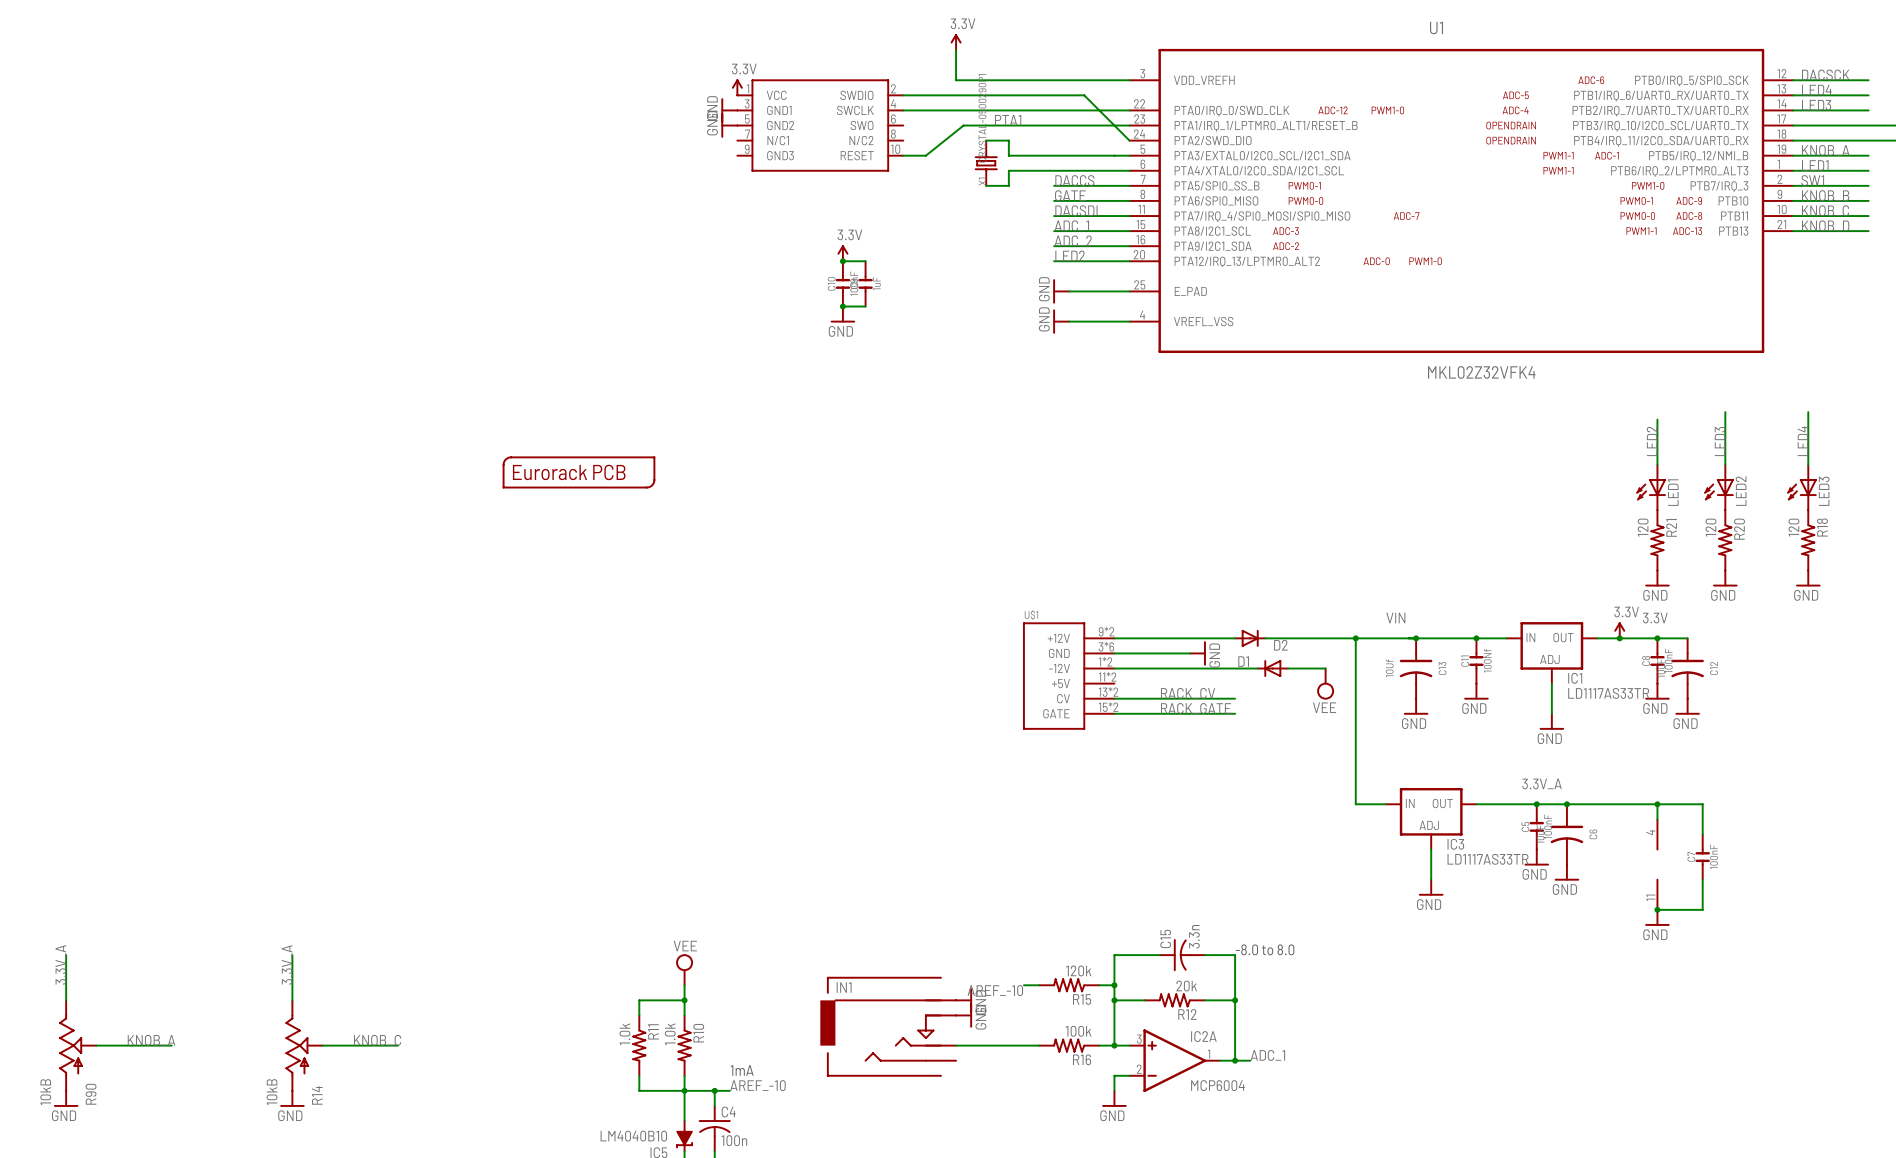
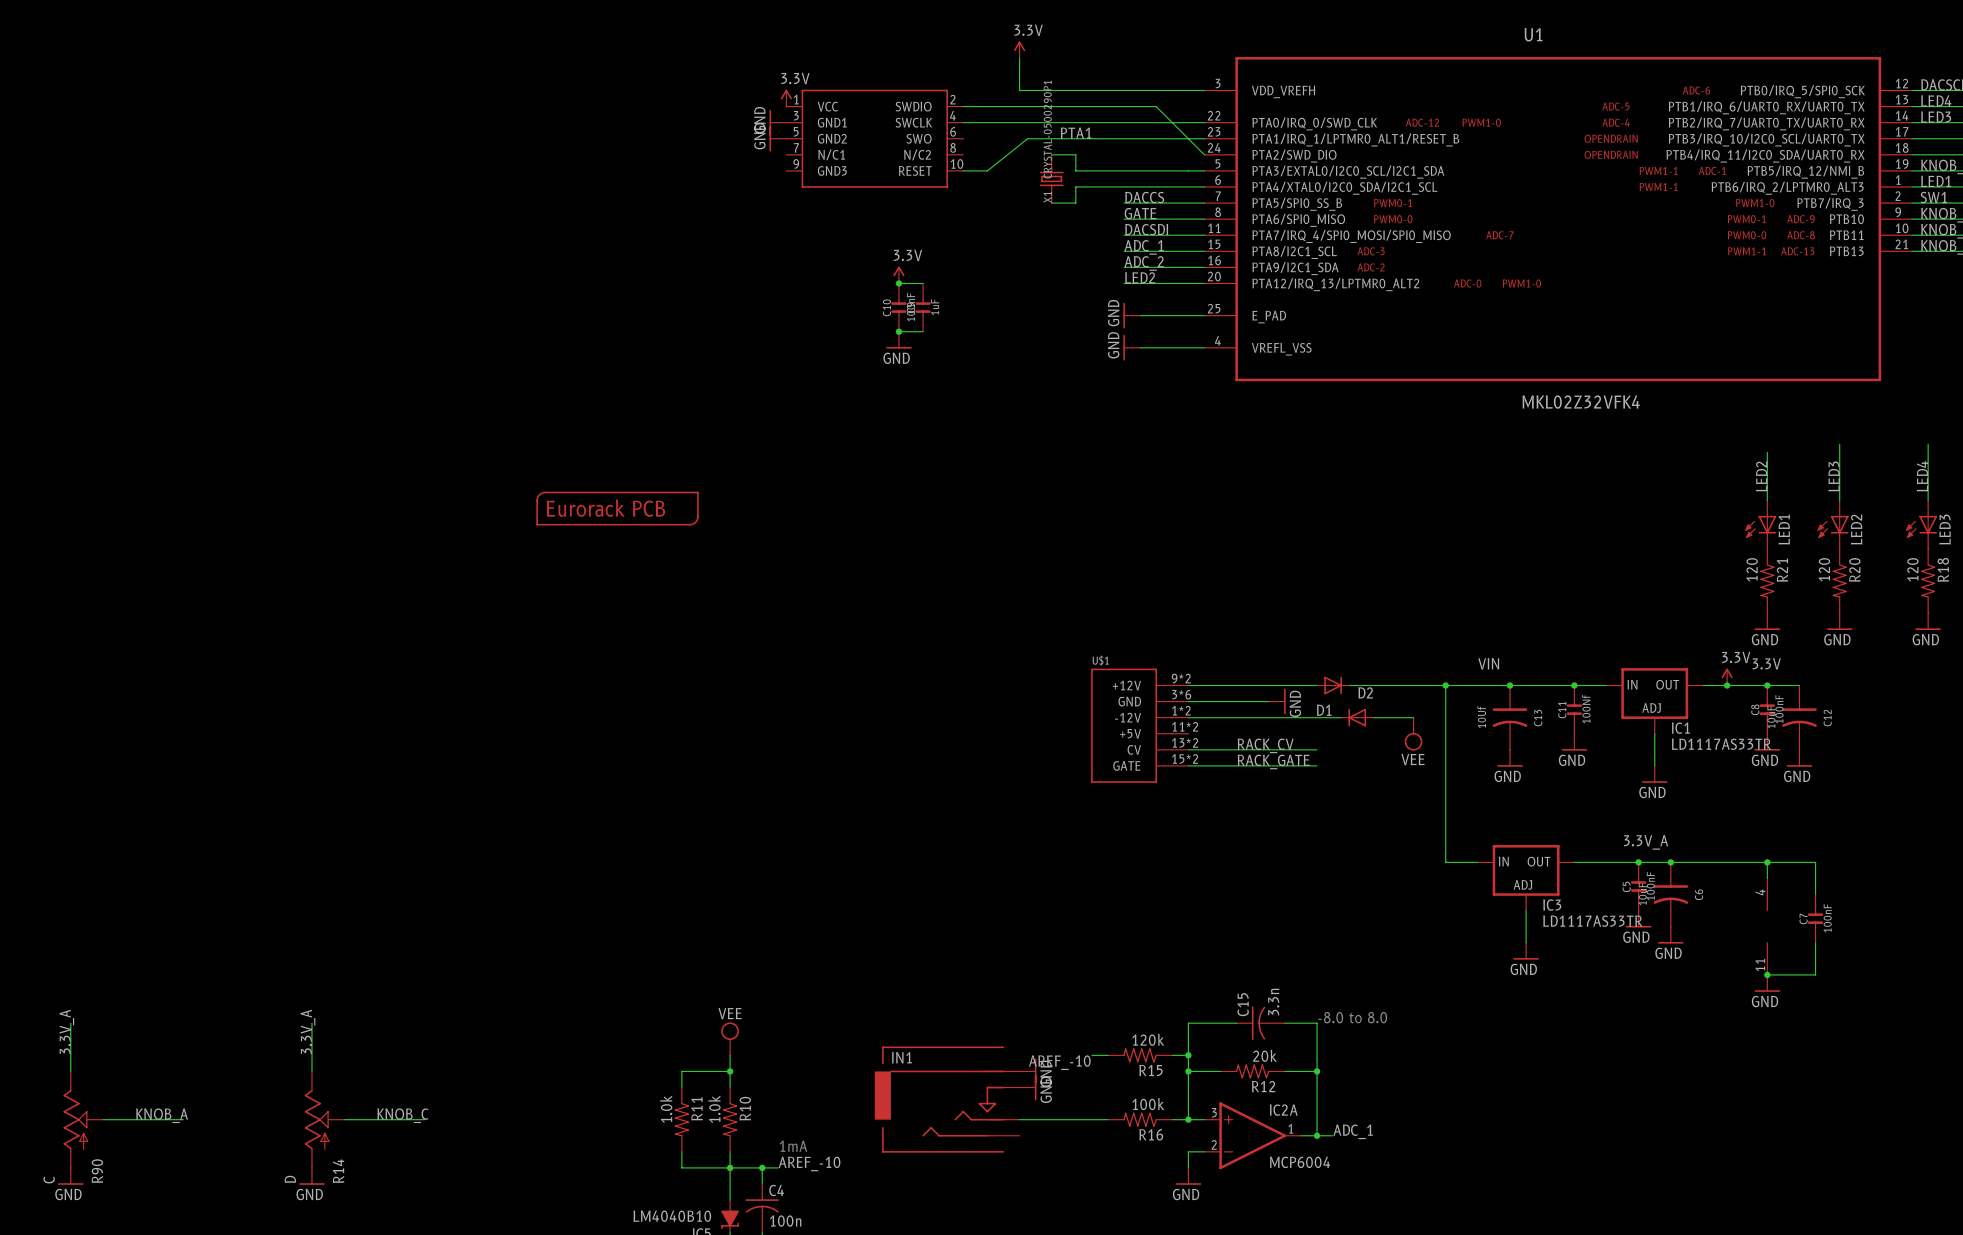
R90 value: 10kB (45, 1092) -> C (49, 1179)
R14 value: 10kB (272, 1092) -> D (290, 1179)

